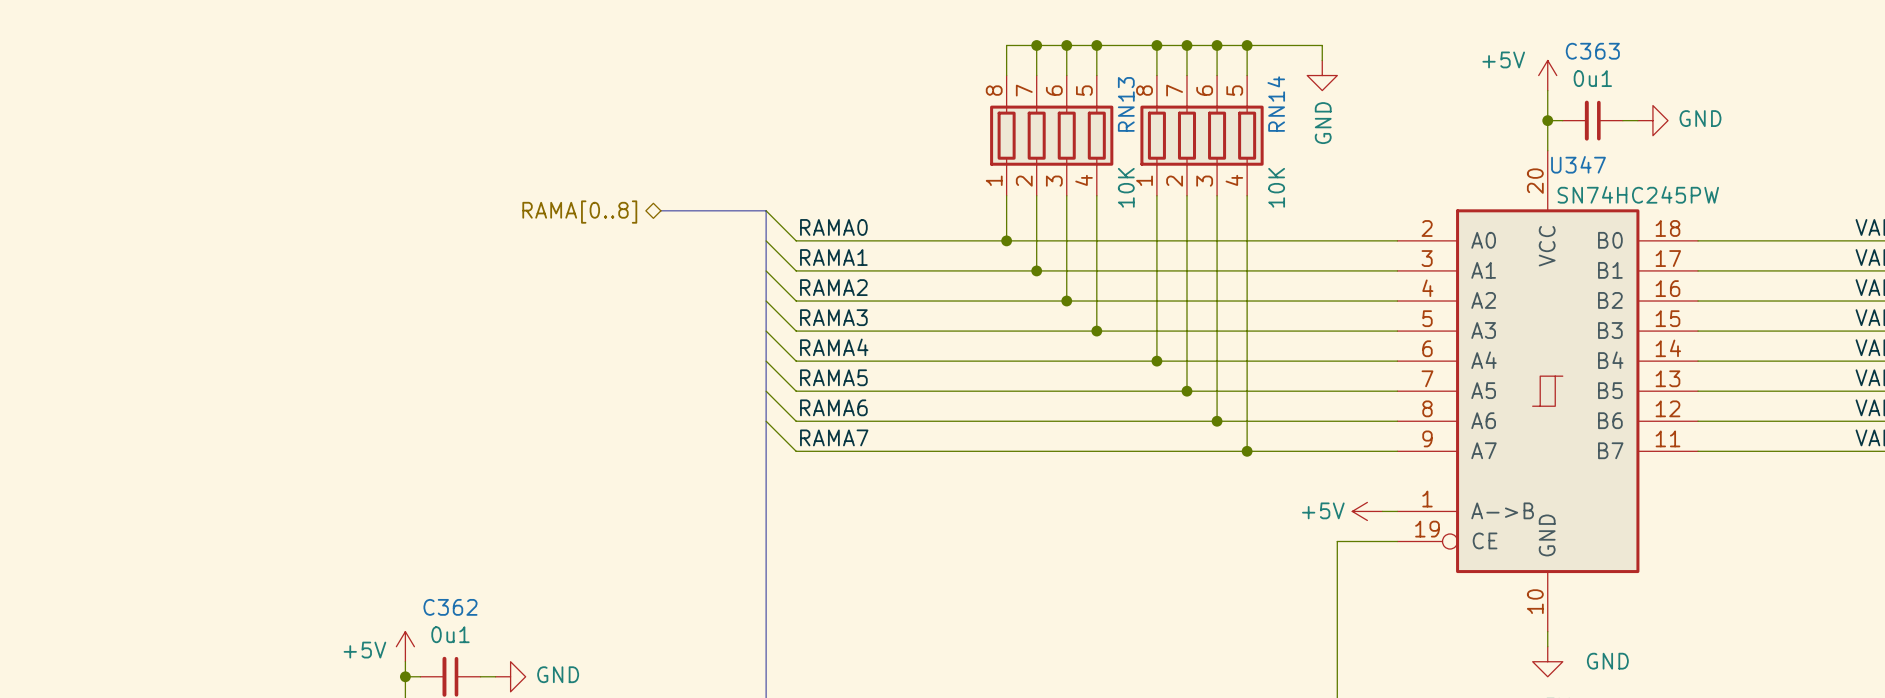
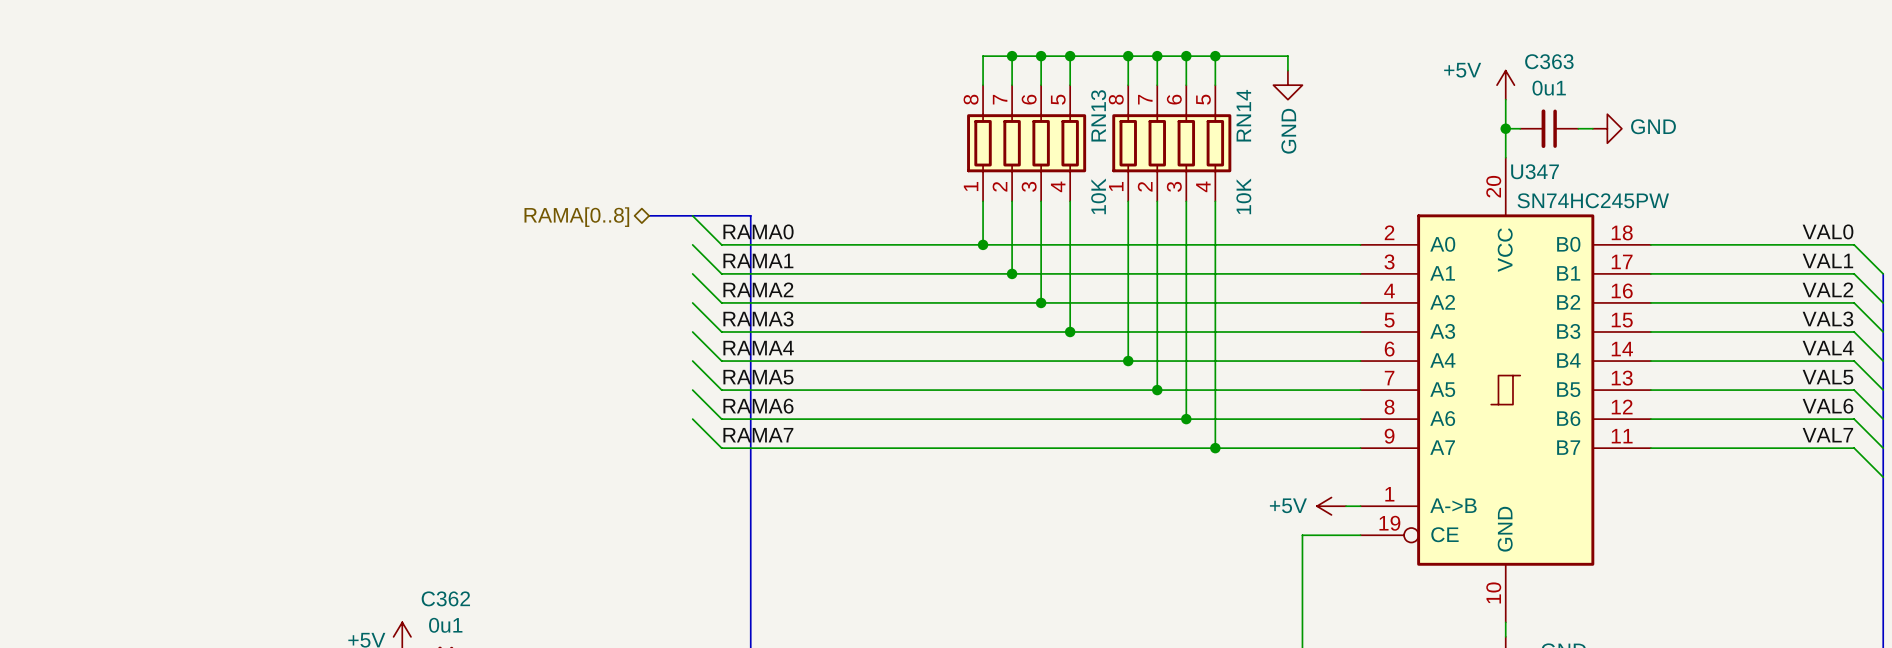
wire: (766, 210) (796, 240) -> (692, 215) (721, 244) (779, 244)
label position: RAMA0 (833, 227) -> RAMA0 (758, 231)
wire: (766, 240) (796, 270) -> (692, 244) (721, 273) (779, 273)
label position: RAMA1 (833, 257) -> RAMA1 (758, 260)
wire: (766, 270) (796, 301) -> (692, 273) (721, 302) (779, 302)
label position: RAMA2 (833, 287) -> RAMA2 (758, 289)
wire: (766, 301) (796, 331) -> (692, 302) (721, 331) (779, 331)
label position: RAMA3 (833, 317) -> RAMA3 (758, 319)
wire: (766, 331) (796, 361) -> (692, 331) (721, 361) (779, 361)
label position: RAMA4 (834, 347) -> RAMA4 (758, 348)
wire: (766, 361) (796, 391) -> (692, 361) (721, 390) (779, 390)
label position: RAMA5 (833, 377) -> RAMA5 (758, 377)
wire: (766, 391) (796, 421) -> (692, 390) (721, 419) (779, 419)
label position: RAMA6 (833, 407) -> RAMA6 (758, 406)
wire: (766, 421) (796, 451) -> (692, 419) (721, 448) (779, 448)
label position: RAMA7 (834, 437) -> RAMA7 (758, 435)

